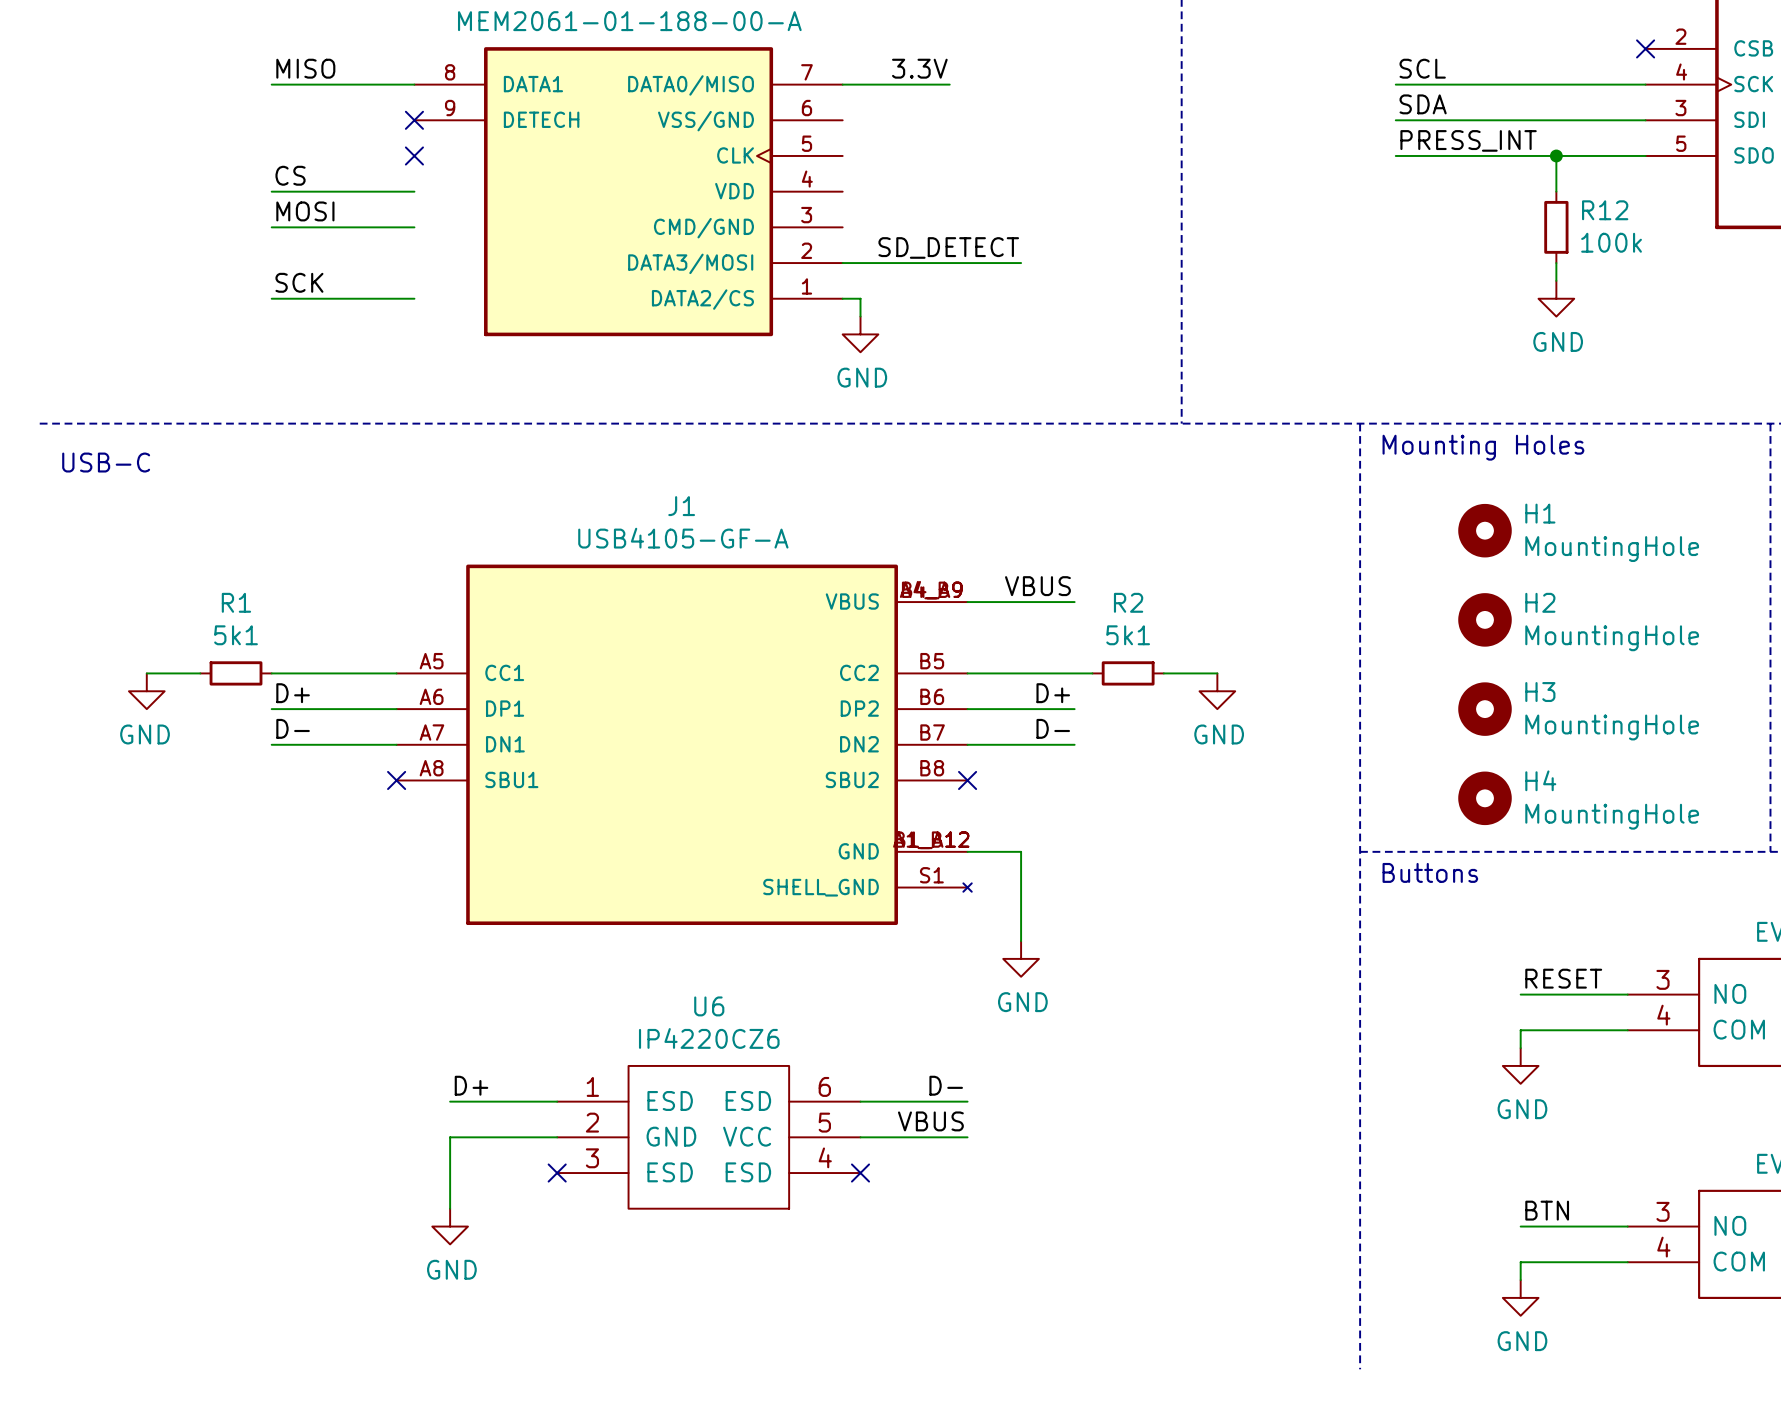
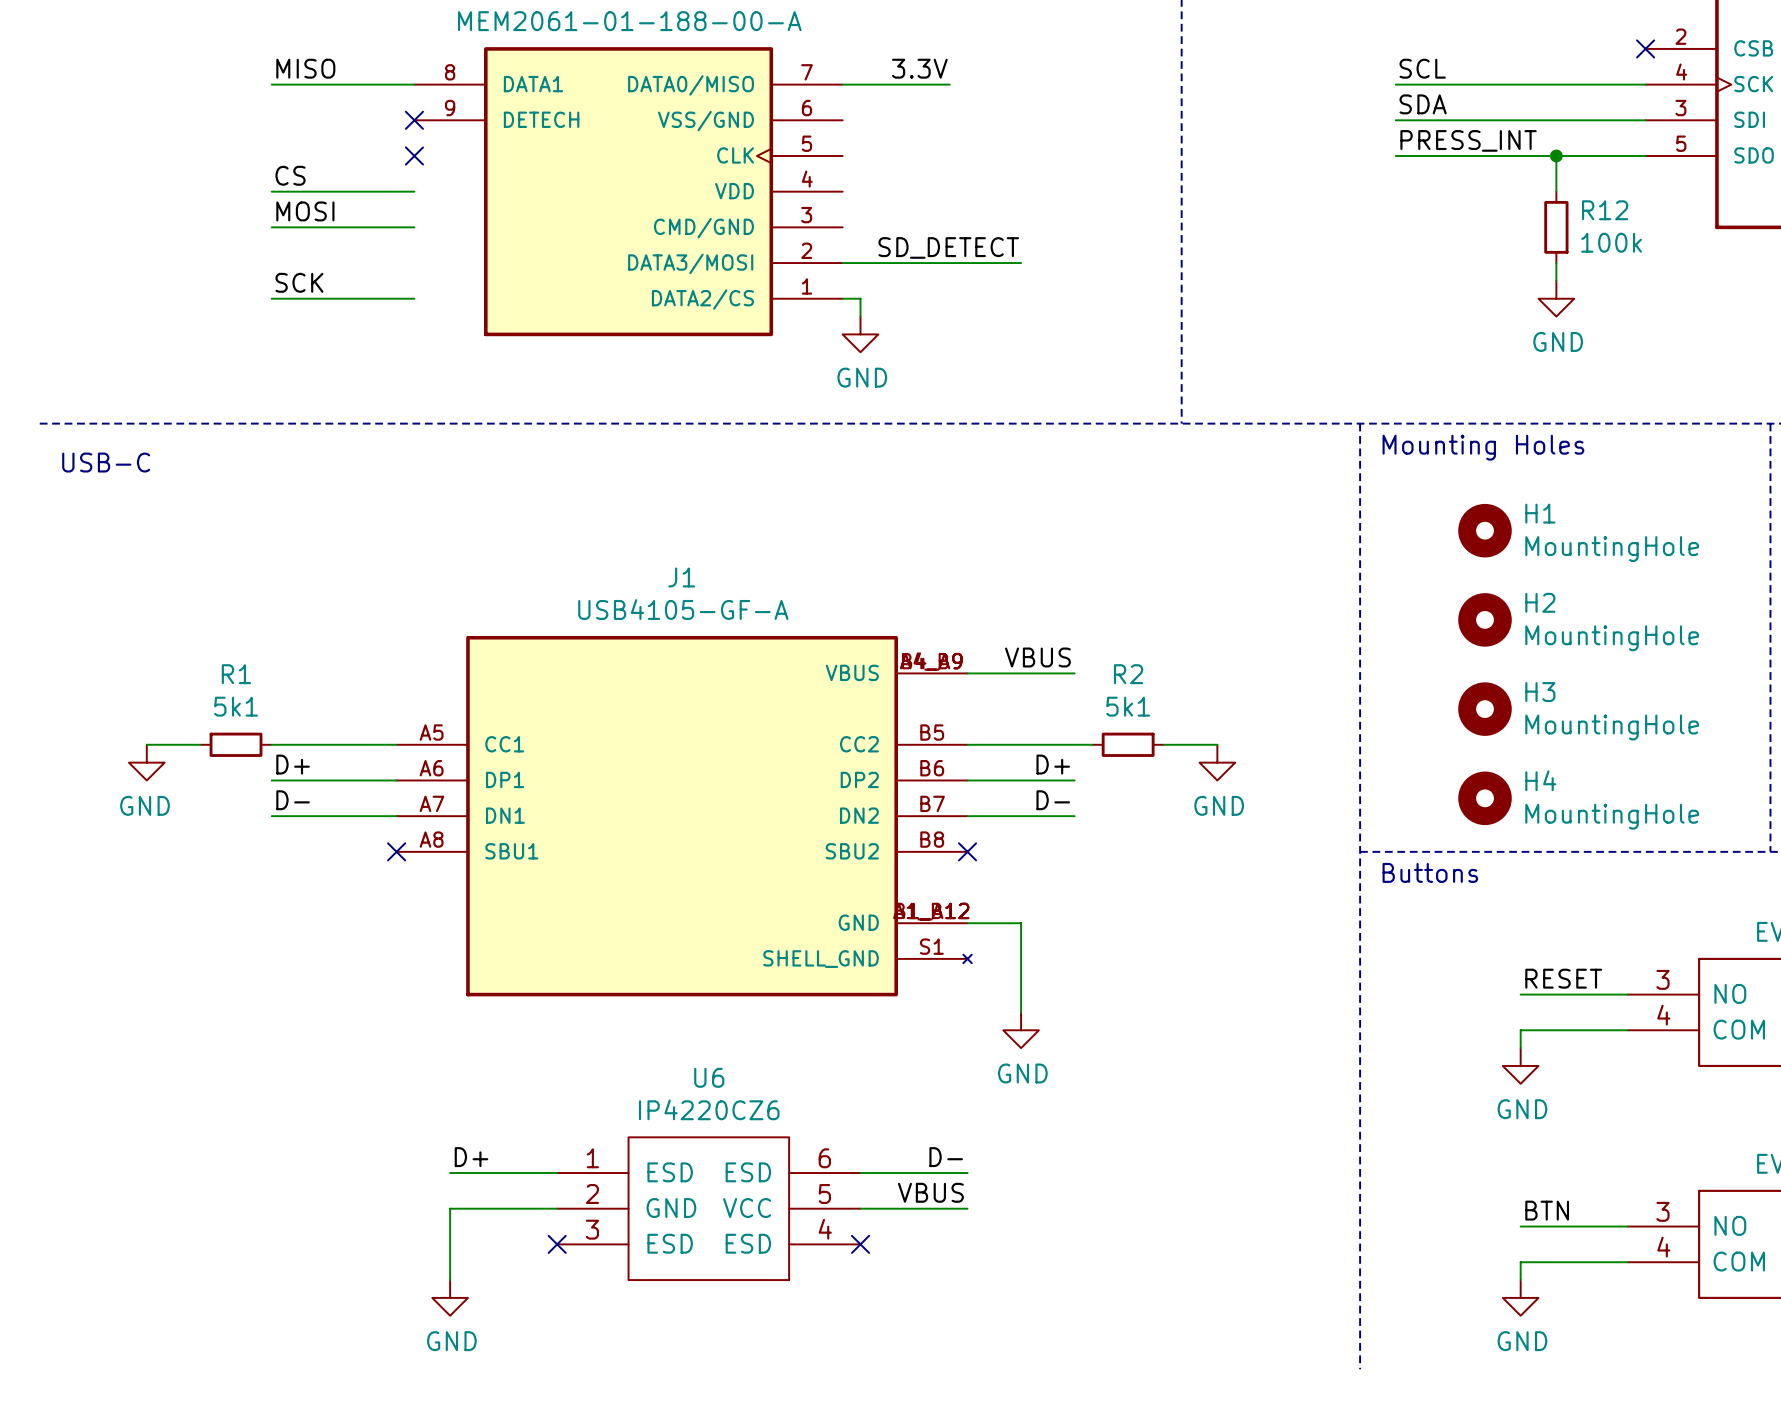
label position: VBUS (1037, 586) -> VBUS (1037, 657)
wire: (967, 602) (1074, 602) -> (967, 816) (1074, 816)
wire: (146, 673) (200, 673) -> (146, 744) (200, 744)
R1 position: (236, 673) -> (236, 744)
wire: (271, 673) (396, 673) -> (271, 816) (396, 816)
wire: (1074, 673) (1092, 673) -> (1074, 744) (1092, 744)
R2 position: (1128, 673) -> (1128, 744)
wire: (1163, 673) (1217, 673) -> (1163, 744) (1217, 744)
power symbol position: GND (146, 691) -> GND (146, 762)
power symbol position: GND (1217, 691) -> GND (1217, 762)
label position: D+ (293, 693) -> D+ (293, 764)
label position: D+ (1053, 693) -> D+ (1053, 764)
wire: (271, 709) (396, 709) -> (271, 780) (396, 780)
wire: (967, 709) (1074, 709) -> (967, 780) (1074, 780)
label position: D- (293, 728) -> D- (293, 800)
label position: D- (1053, 728) -> D- (1053, 800)
J1 position: (684, 744) -> (684, 816)
no-connect mark position: (396, 780) -> (396, 851)
no-connect mark position: (967, 780) -> (967, 851)
wire: (967, 851) (1021, 851) (1021, 923) -> (967, 923) (1021, 923)
wire: none -> (1021, 941) (1021, 1012)
power symbol position: GND (1021, 958) -> GND (1021, 1030)
label position: D+ (471, 1085) -> D+ (471, 1157)
label position: D- (946, 1085) -> D- (946, 1157)
wire: (450, 1101) (557, 1101) -> (450, 1173) (557, 1173)
wire: (860, 1101) (967, 1101) -> (860, 1173) (967, 1173)
label position: VBUS (930, 1121) -> VBUS (930, 1192)
wire: (557, 1137) (450, 1137) (450, 1208) -> (557, 1208) (450, 1208) (450, 1280)
U6 position: (708, 1137) -> (708, 1208)
wire: (860, 1137) (967, 1137) -> (860, 1208) (967, 1208)
no-connect mark position: (557, 1173) -> (557, 1244)
no-connect mark position: (860, 1173) -> (860, 1244)
power symbol position: GND (450, 1226) -> GND (450, 1297)

